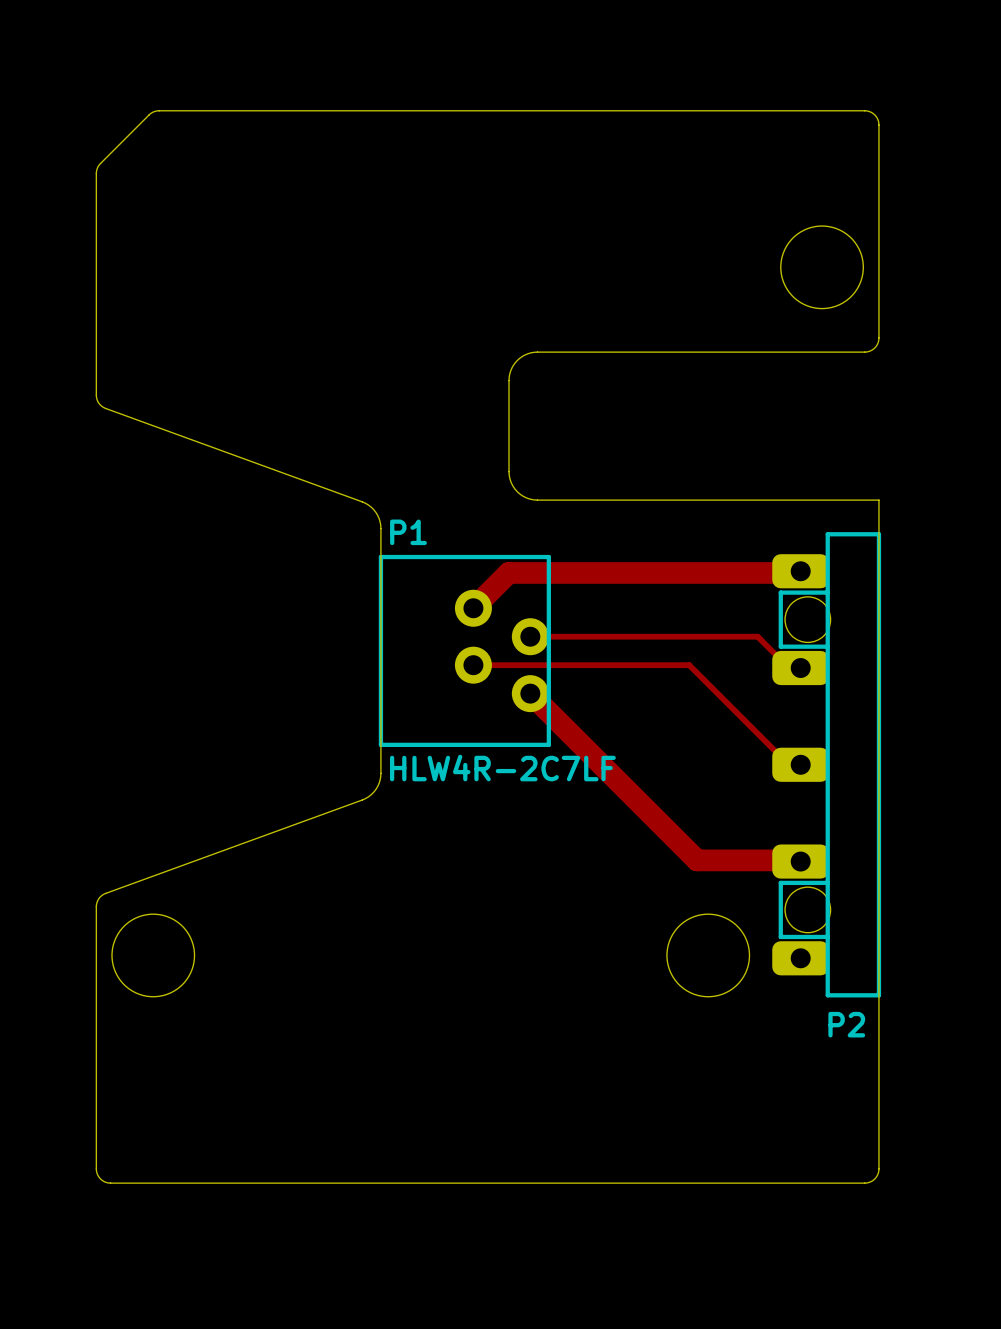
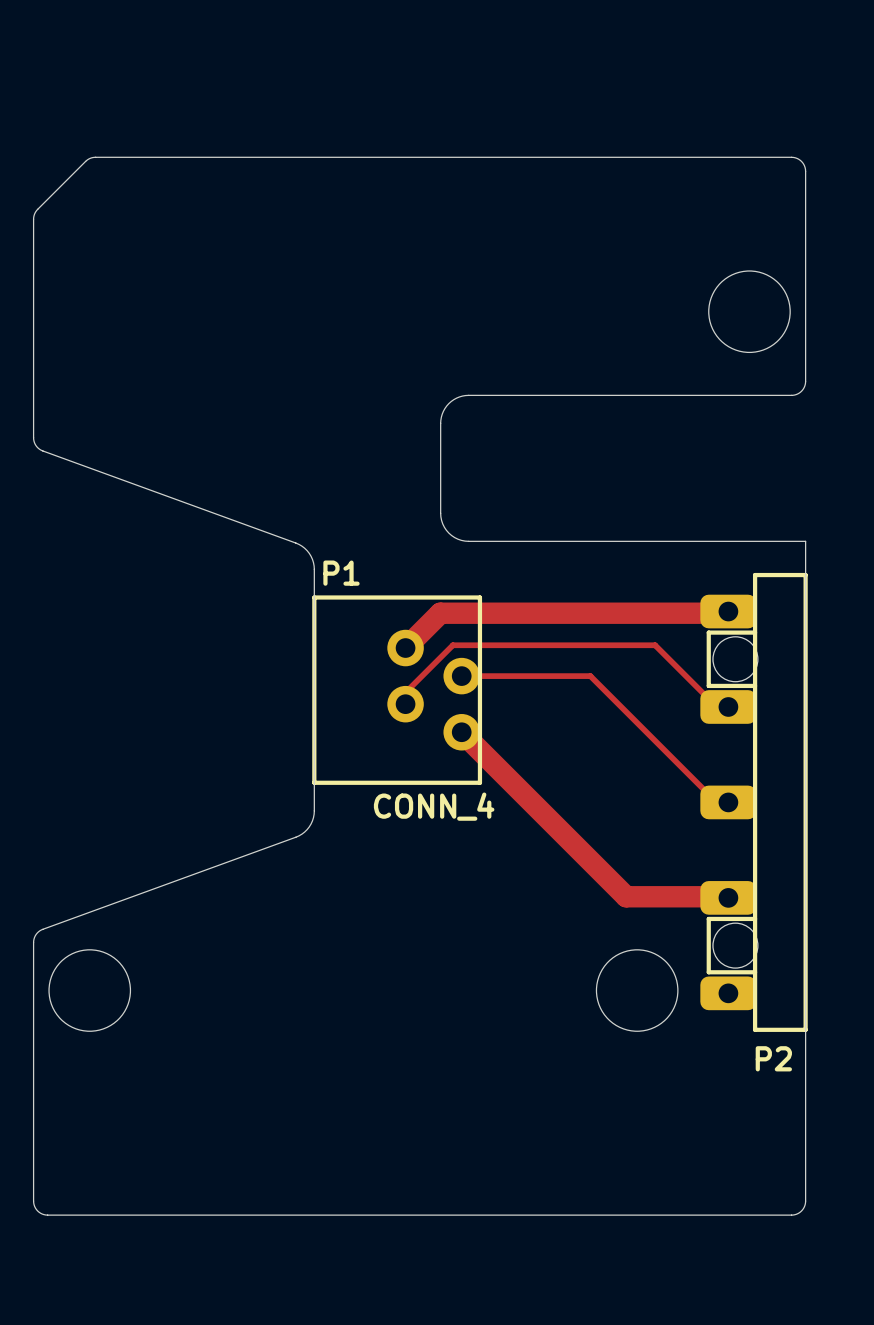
track: (660, 636) (757, 636) -> (590, 676) (618, 704)
track: (473, 665) (689, 665) -> (405, 704) (405, 692) (452, 645) (655, 645) (685, 676)
P1 value: HLW4R-2C7LF (502, 768) -> CONN_4 (434, 806)

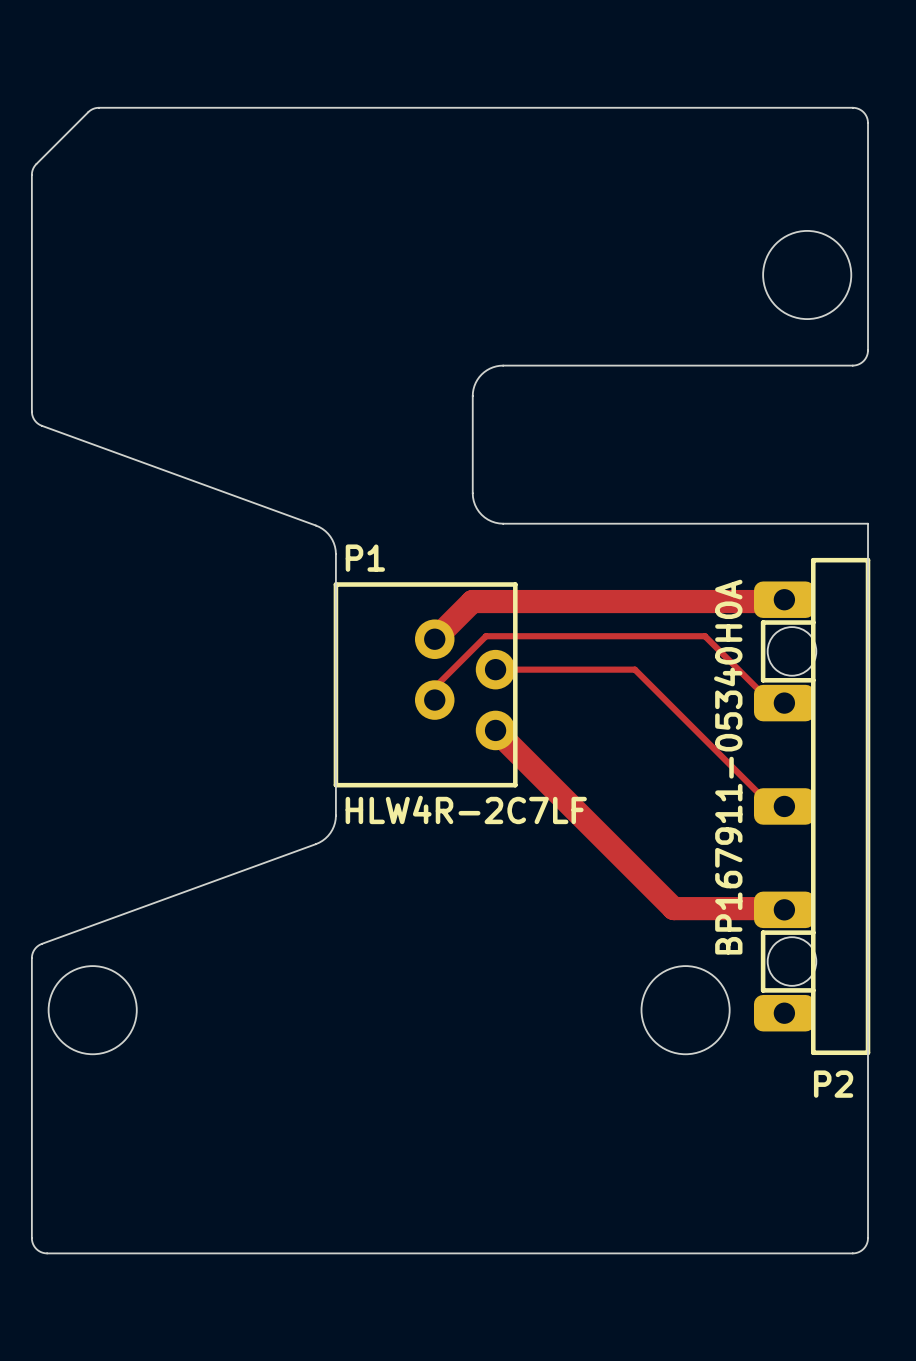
P2 value: none -> BP167911-05340H0A (728, 767)
P1 value: CONN_4 (434, 806) -> HLW4R-2C7LF (466, 809)

